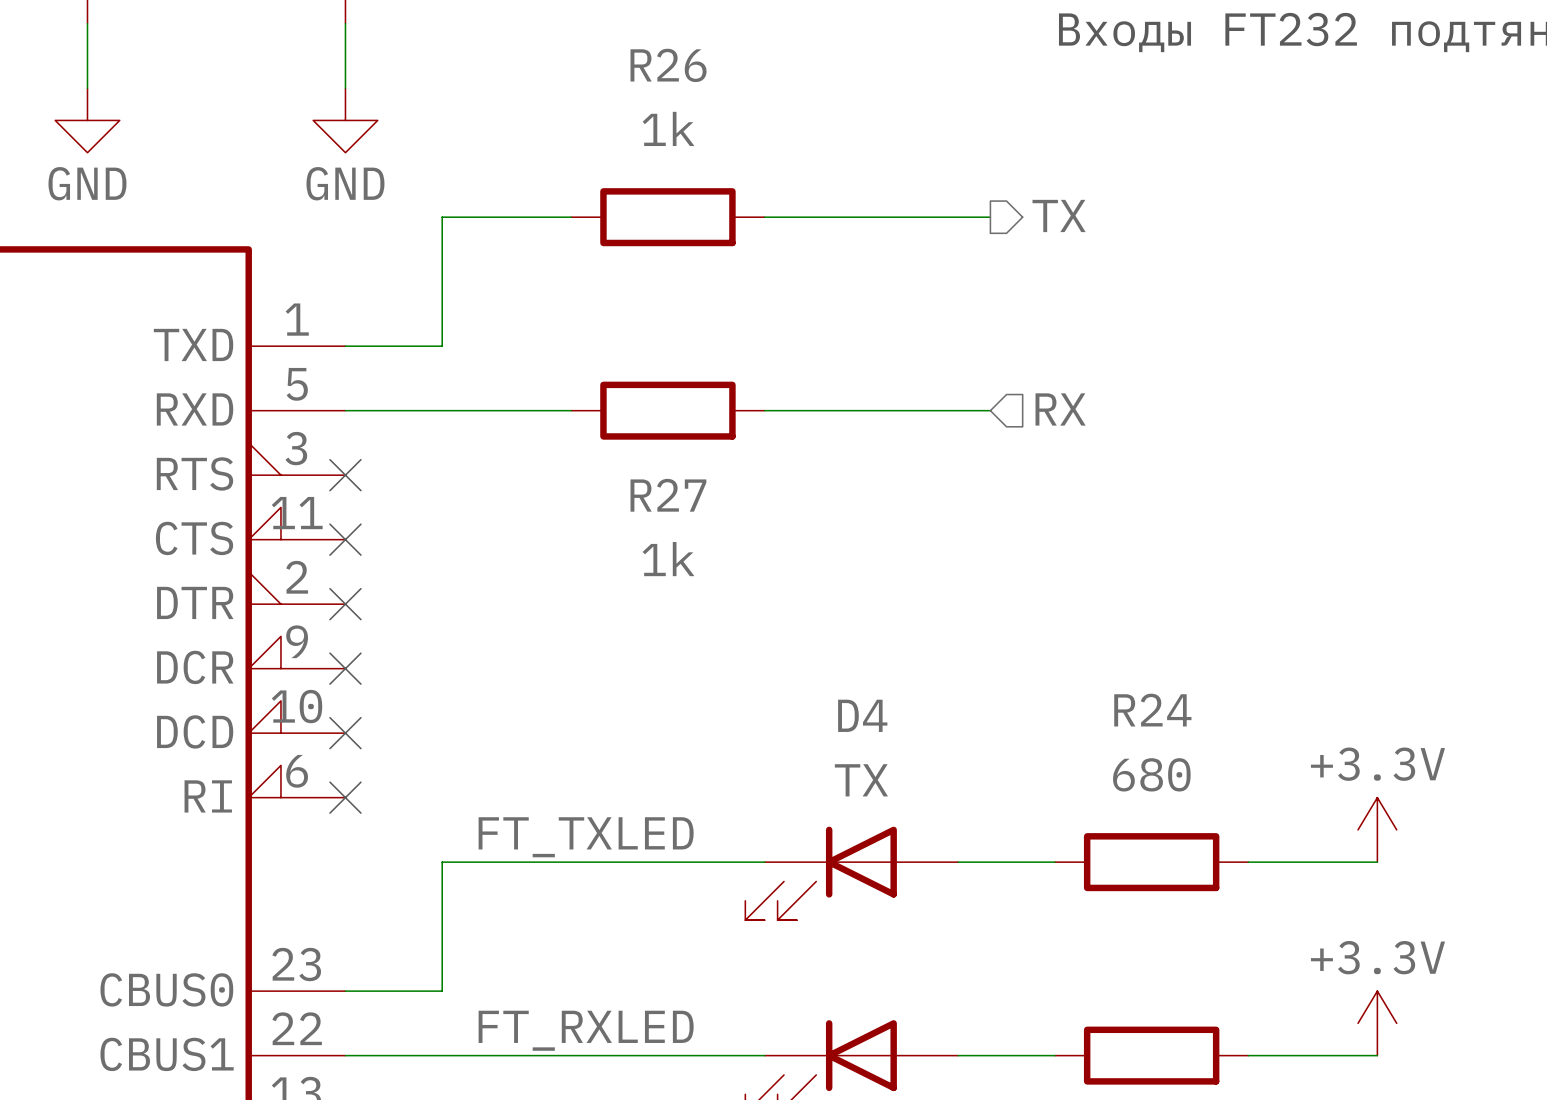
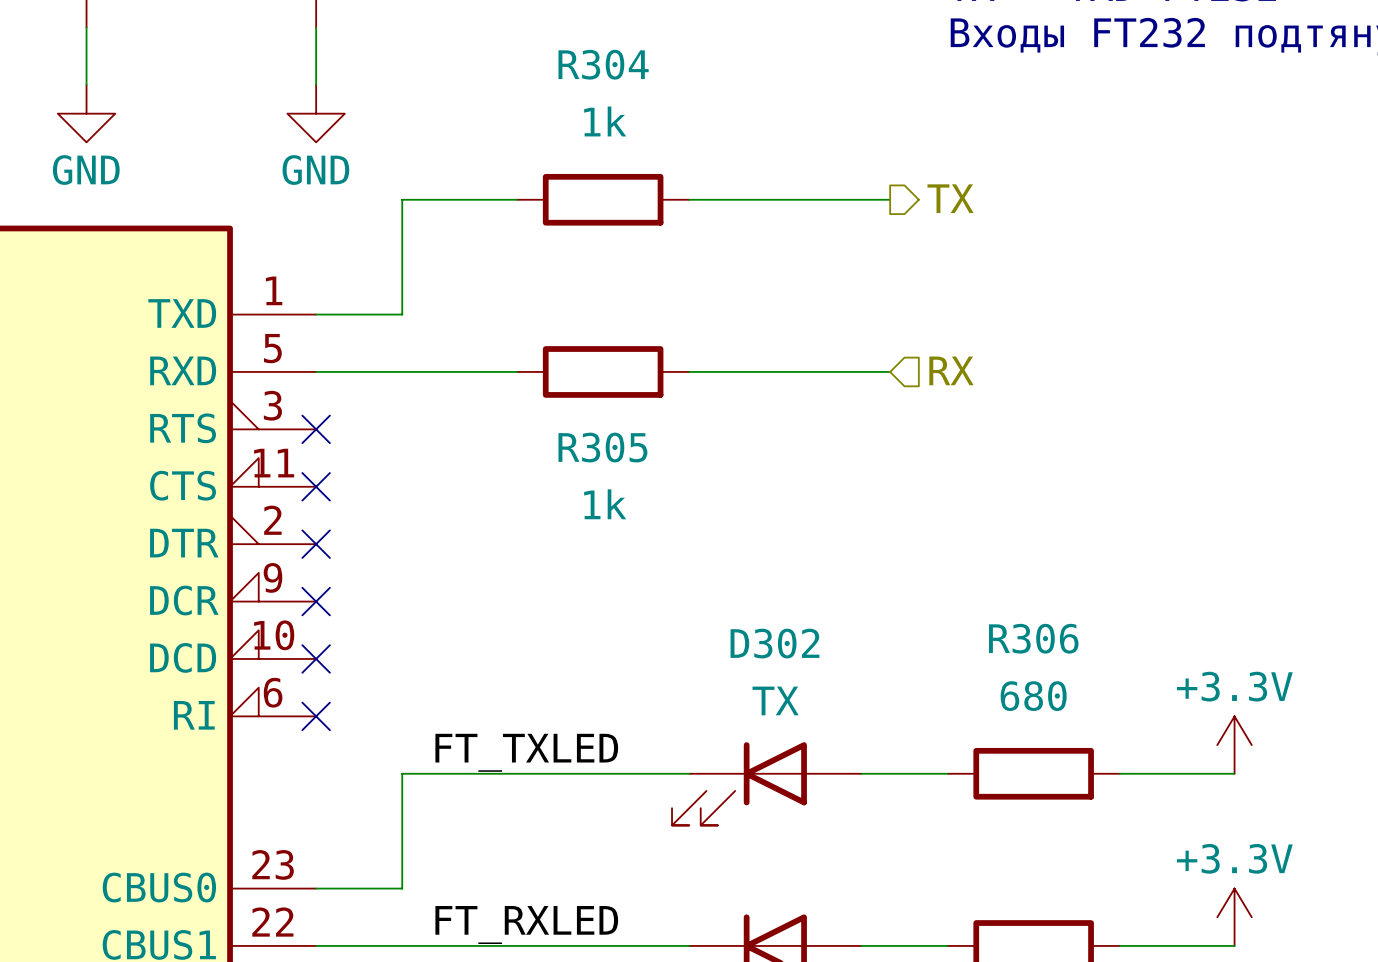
R26 name: R26 (668, 65) -> R304 (603, 64)
R27 name: R27 (668, 495) -> R305 (602, 447)
R24 name: R24 (1152, 710) -> R306 (1033, 638)
D4 name: D4 (862, 715) -> D302 (774, 643)

